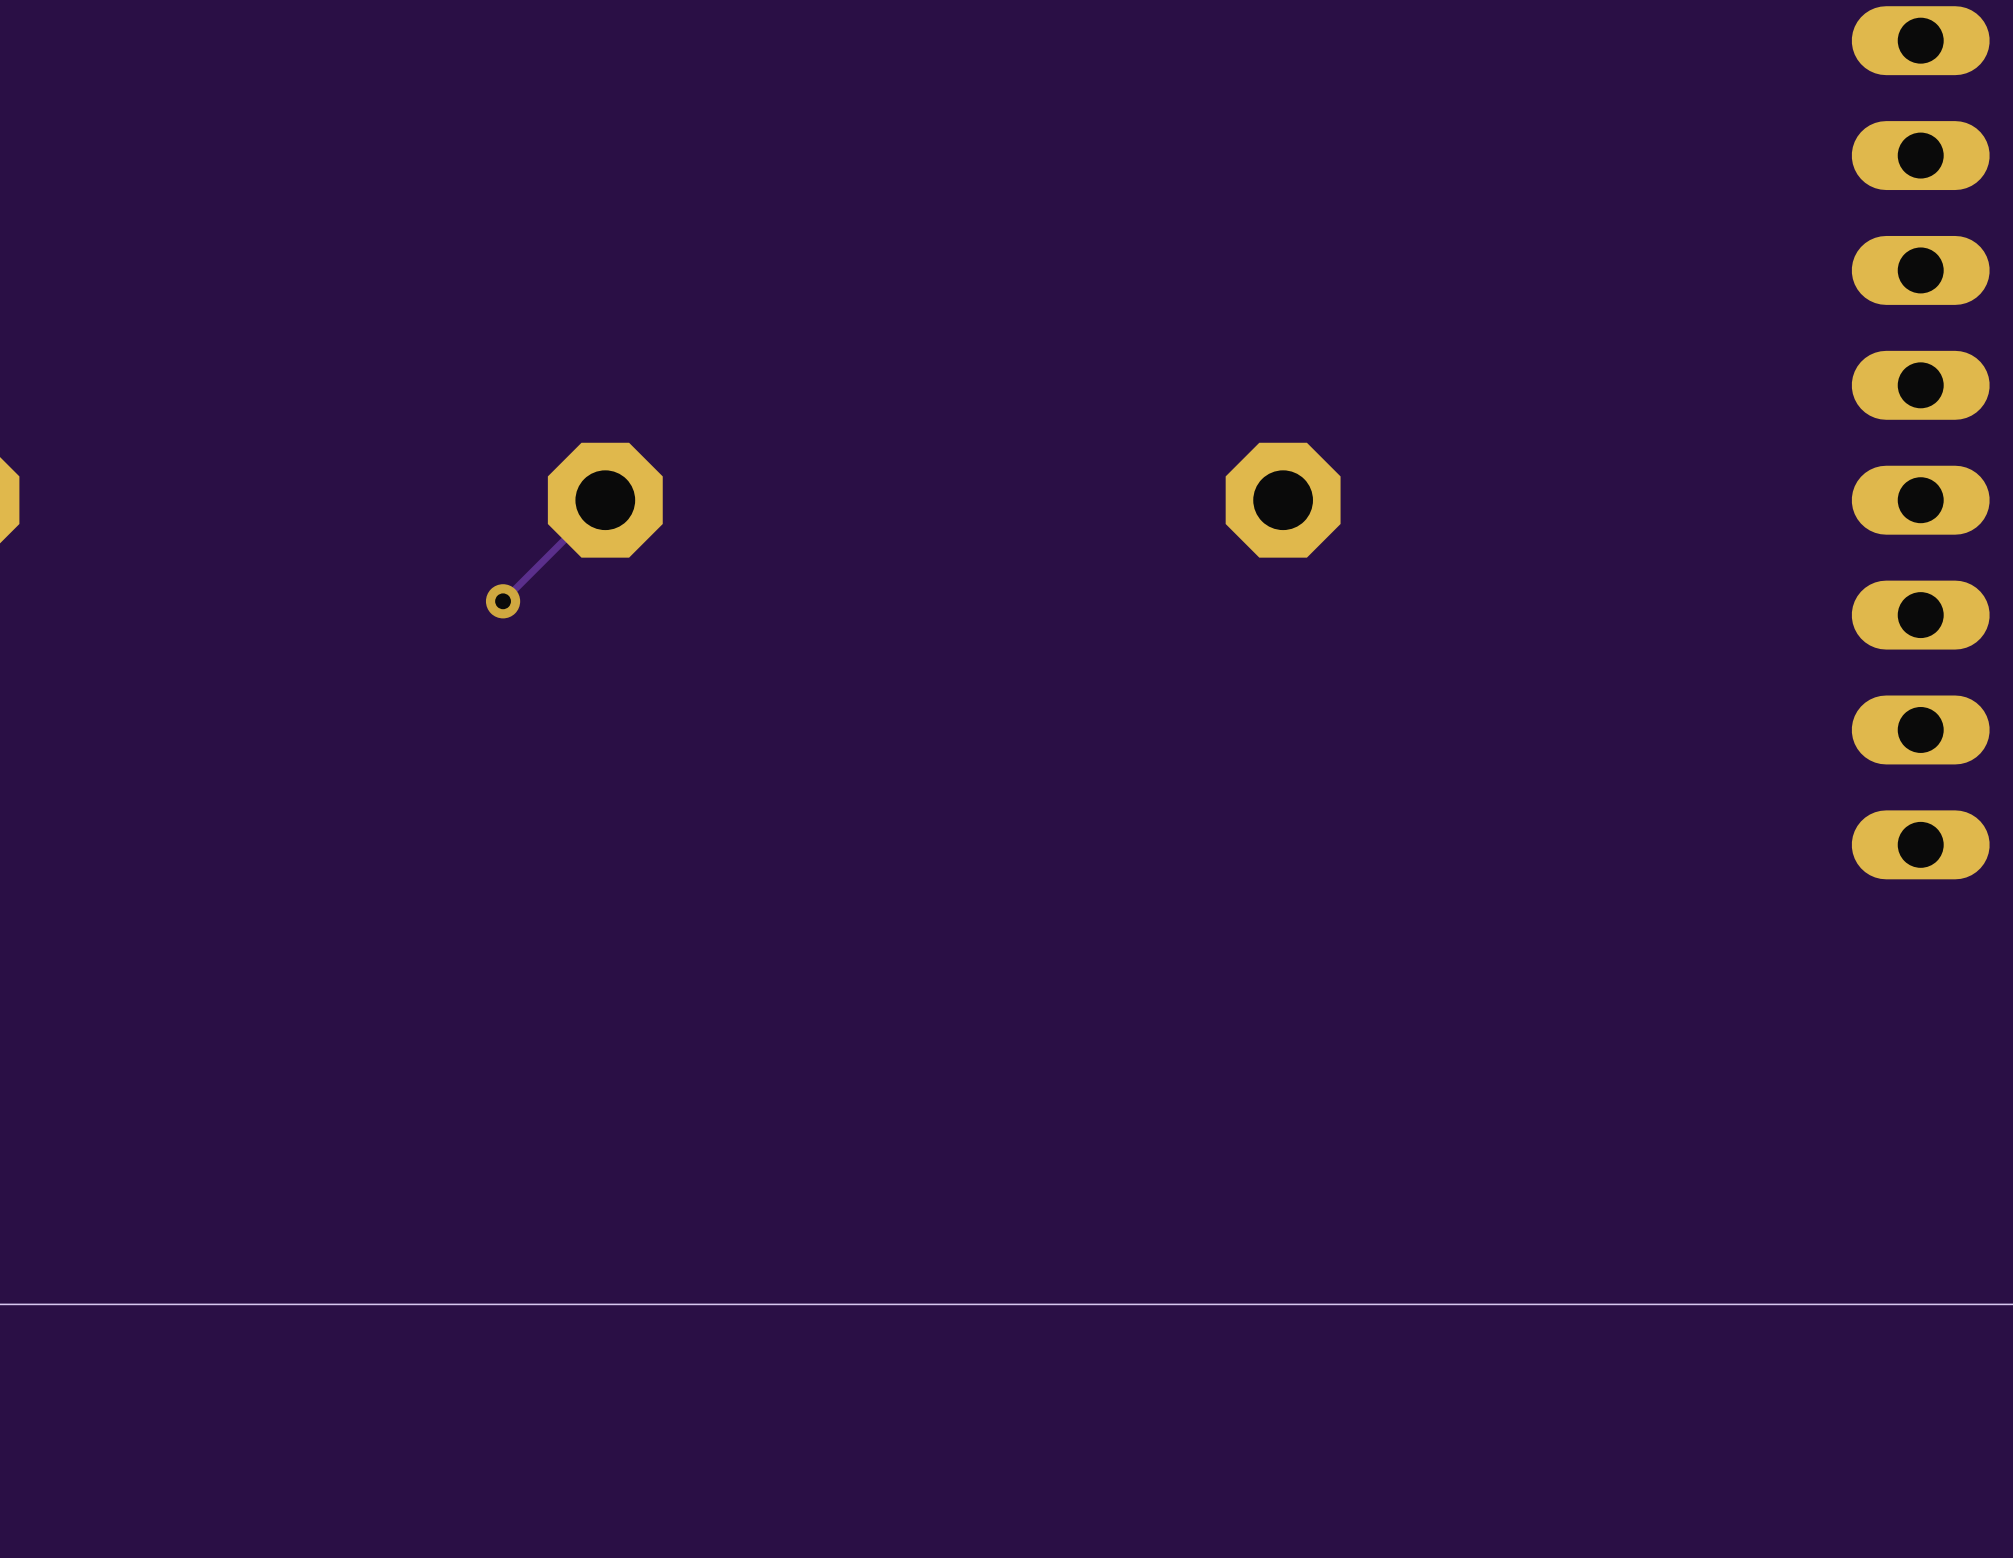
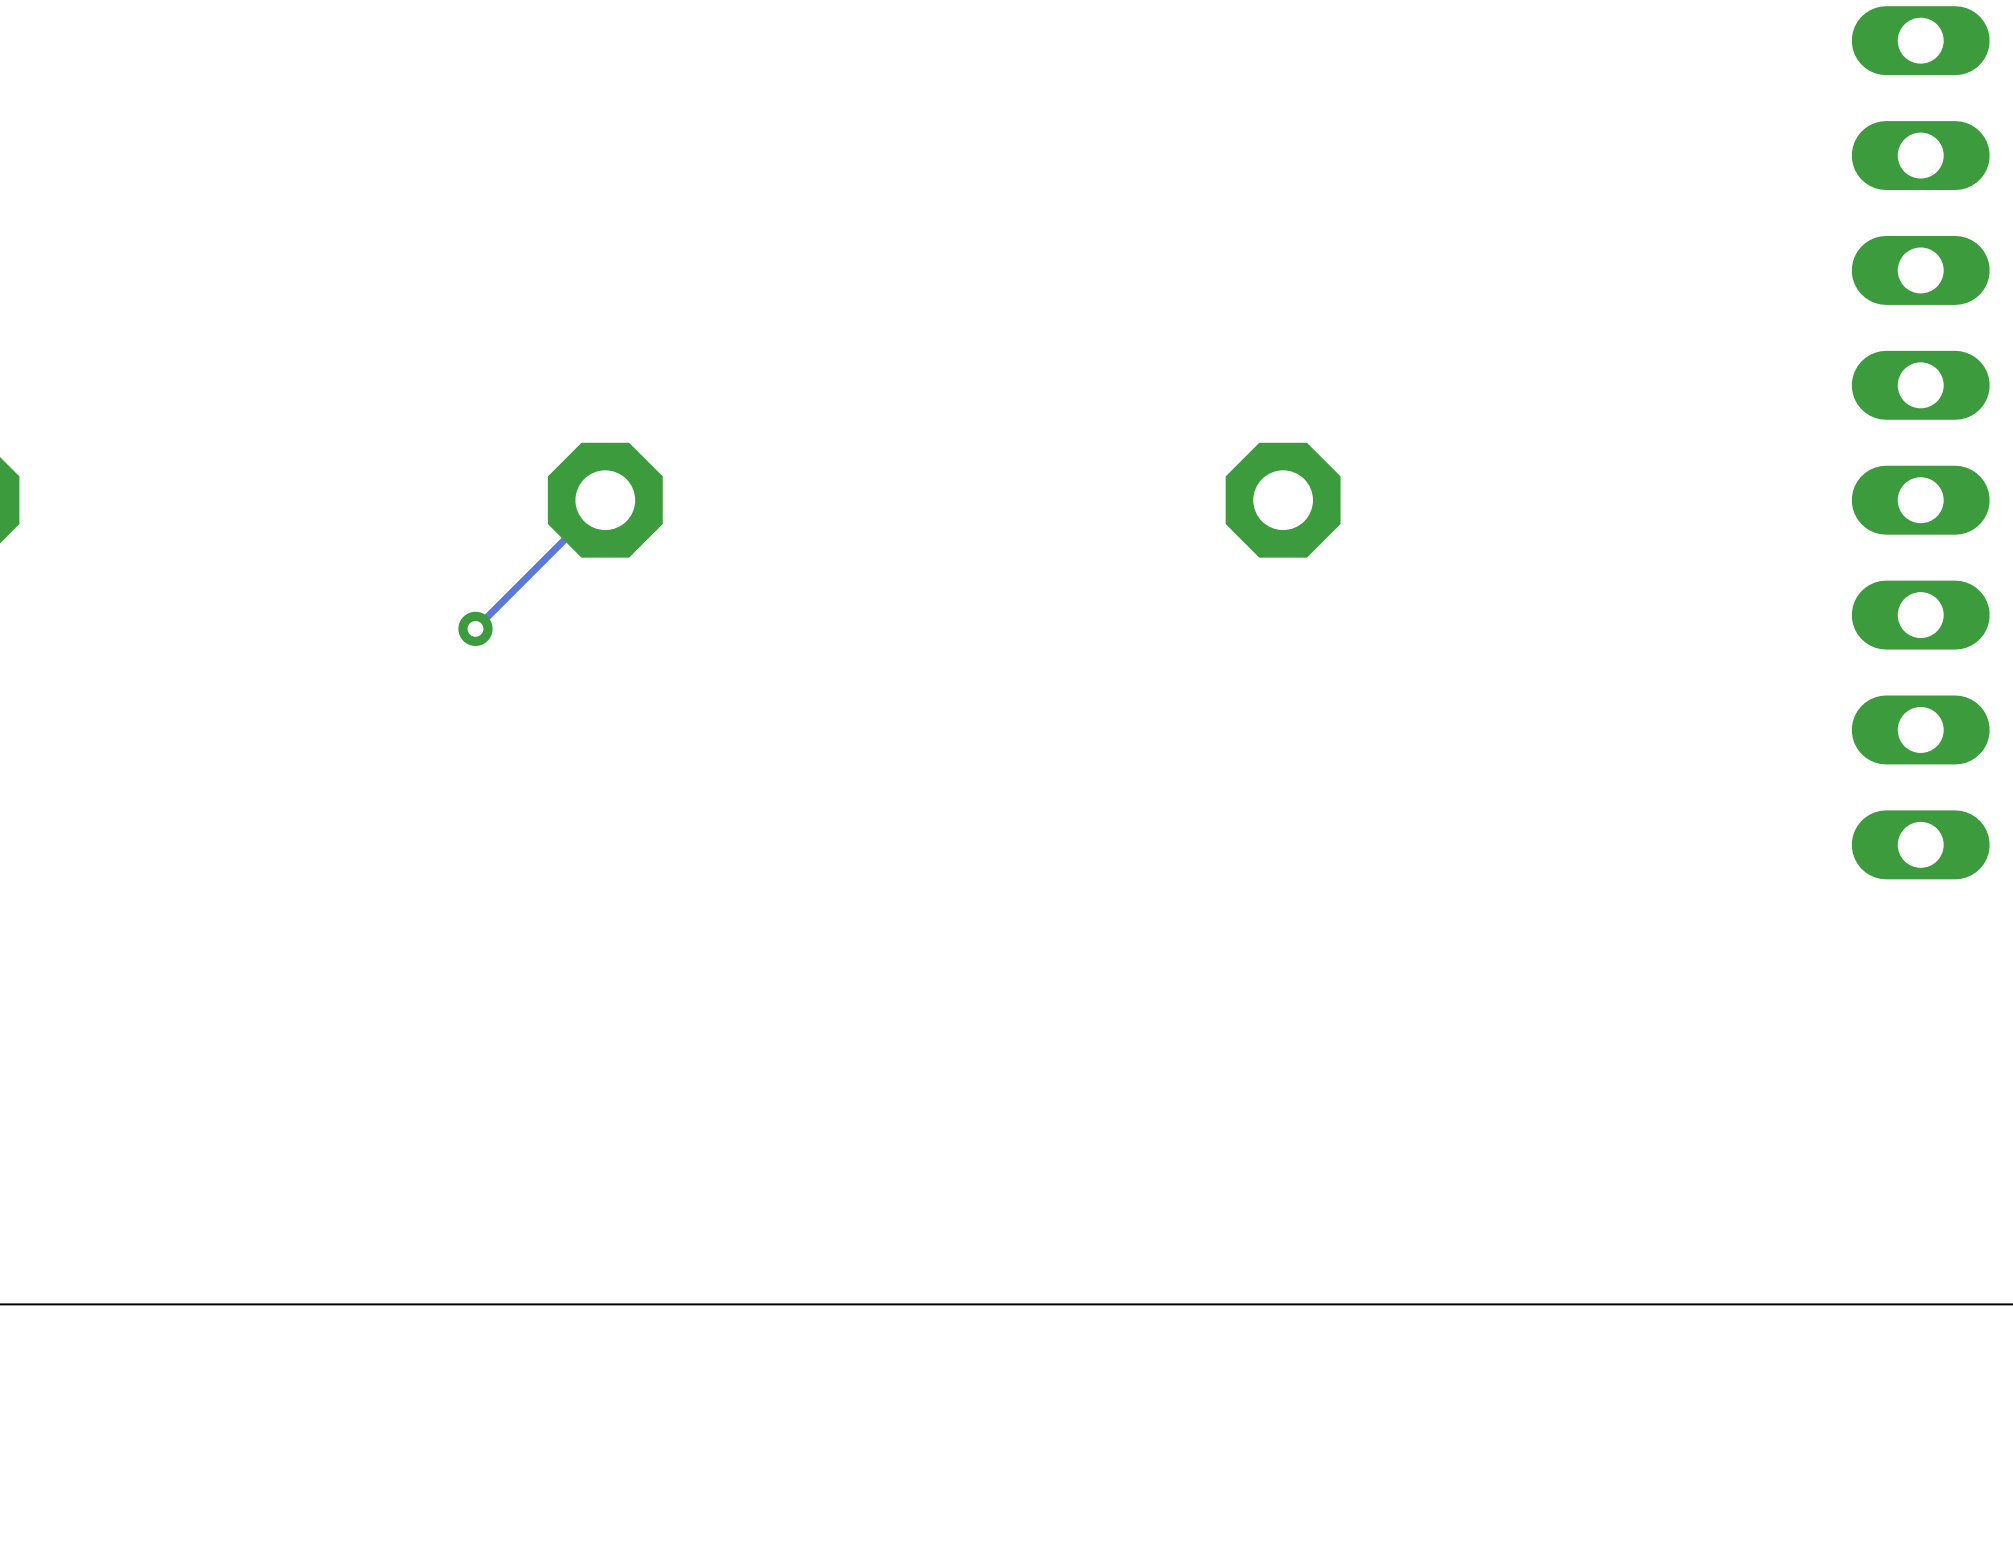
track: none -> (503, 601) (475, 628)
via position: (503, 601) -> (475, 628)

